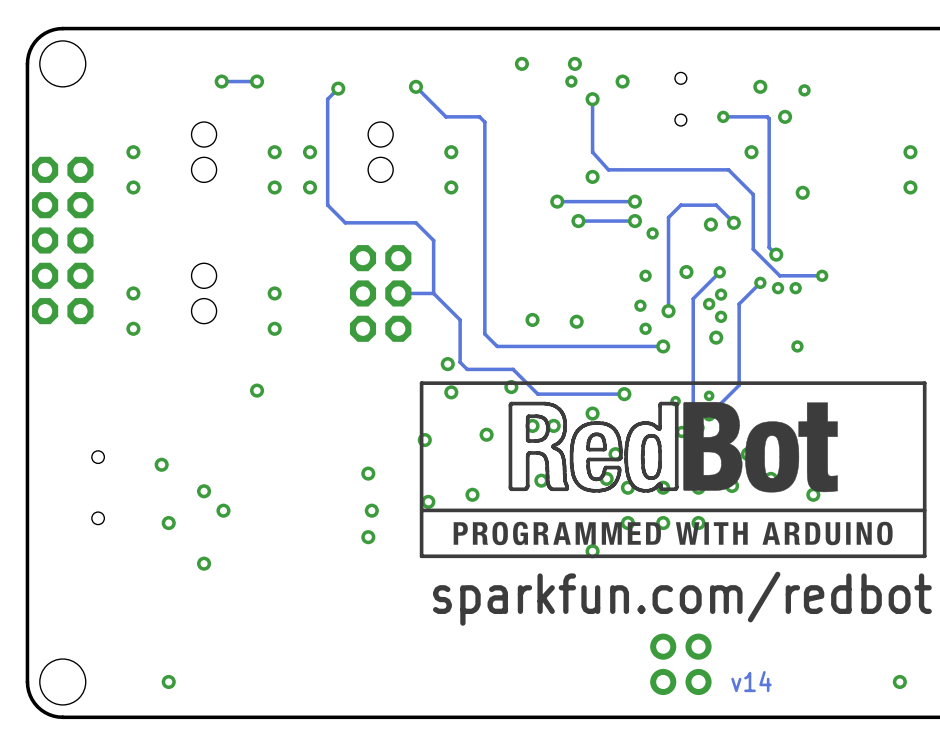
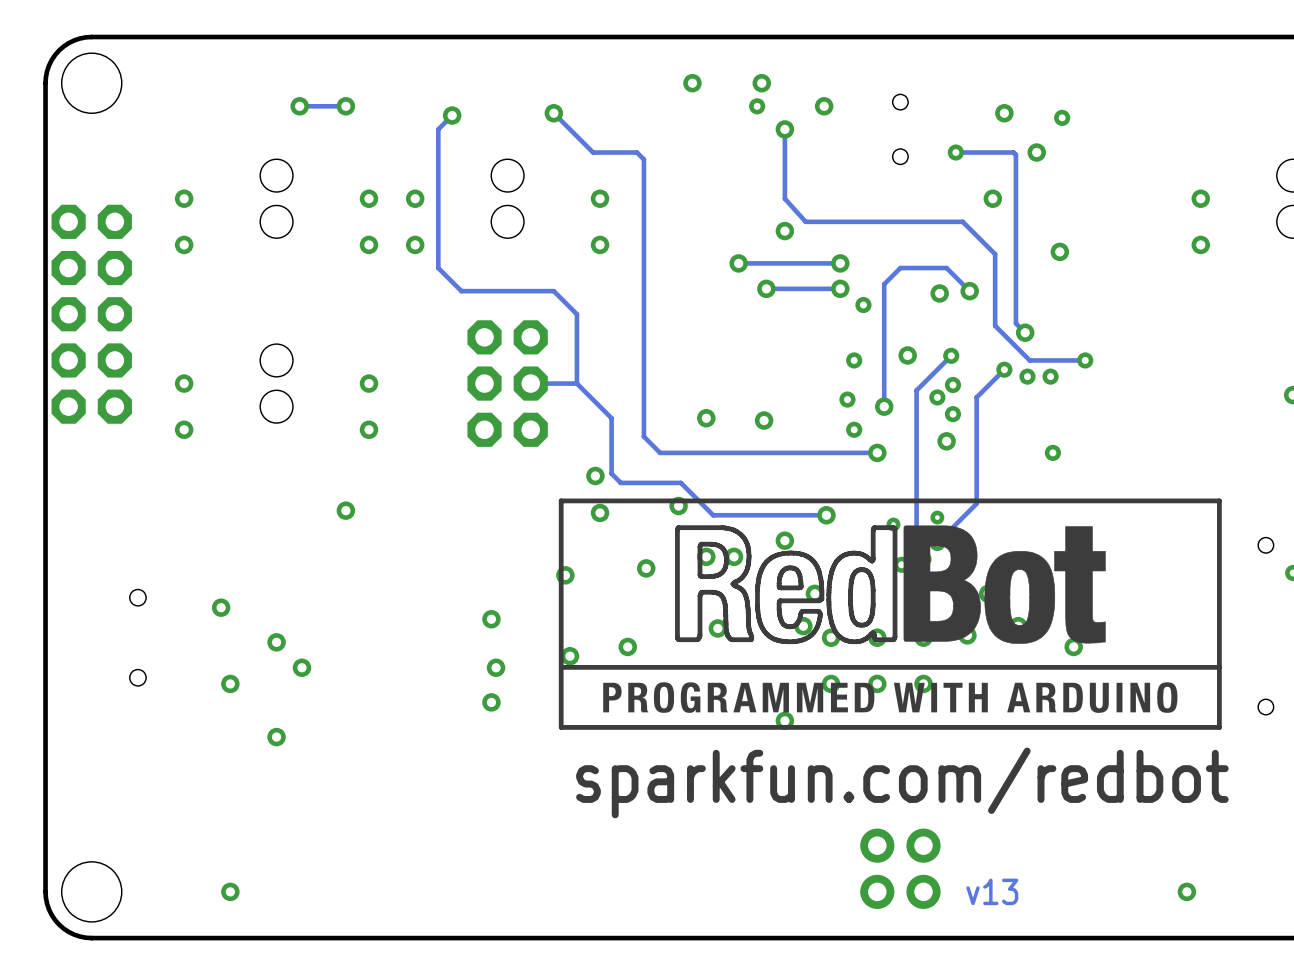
text: v14 (751, 681) -> v13 (992, 891)

